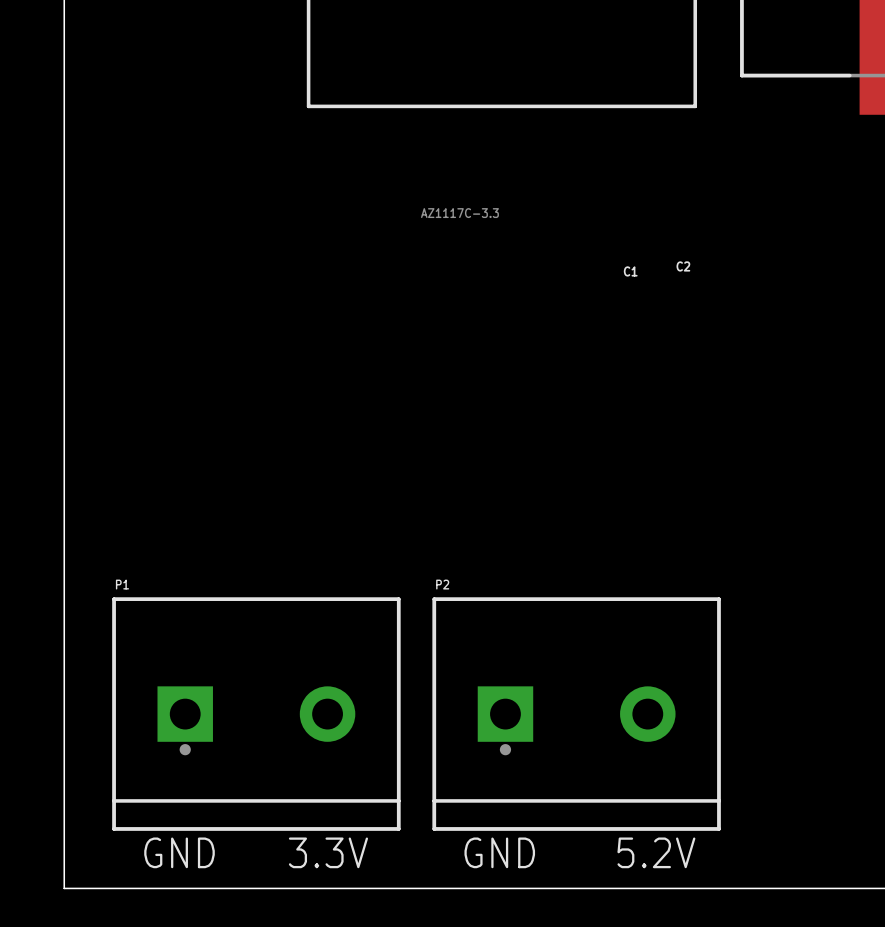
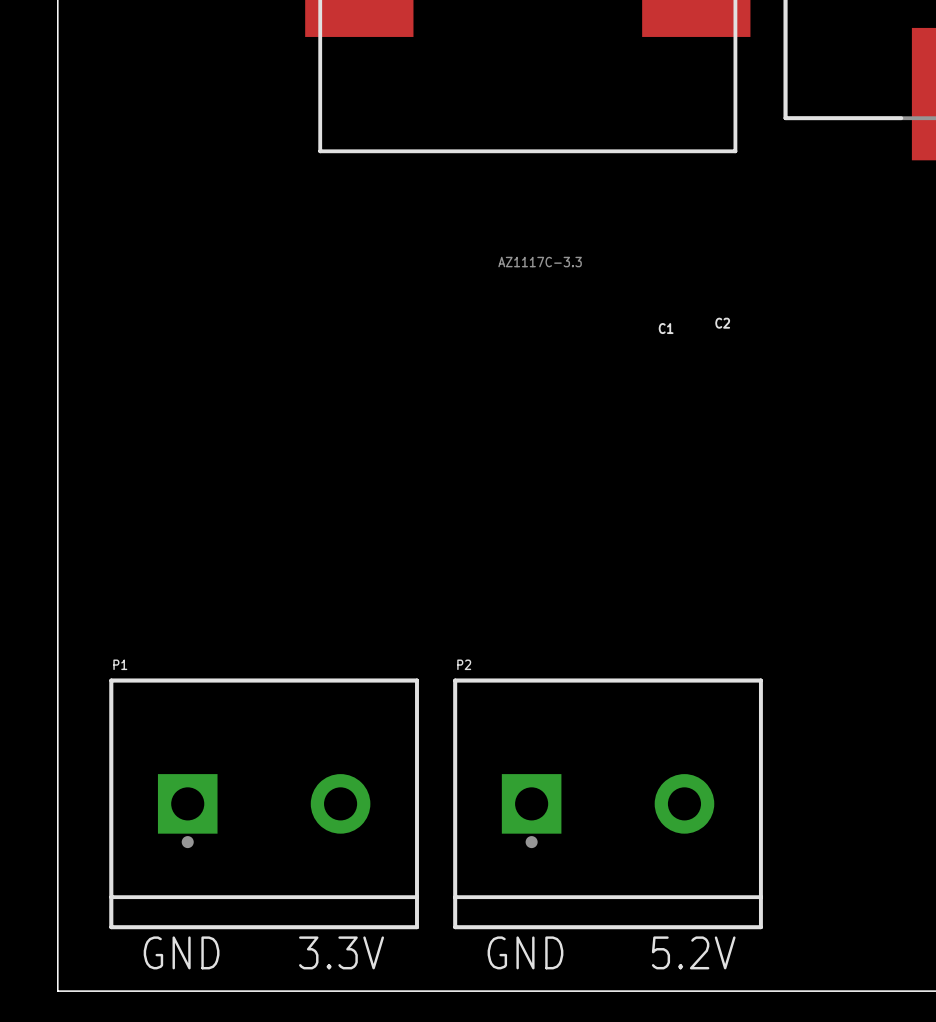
part position: (459, 213) -> (540, 262)

